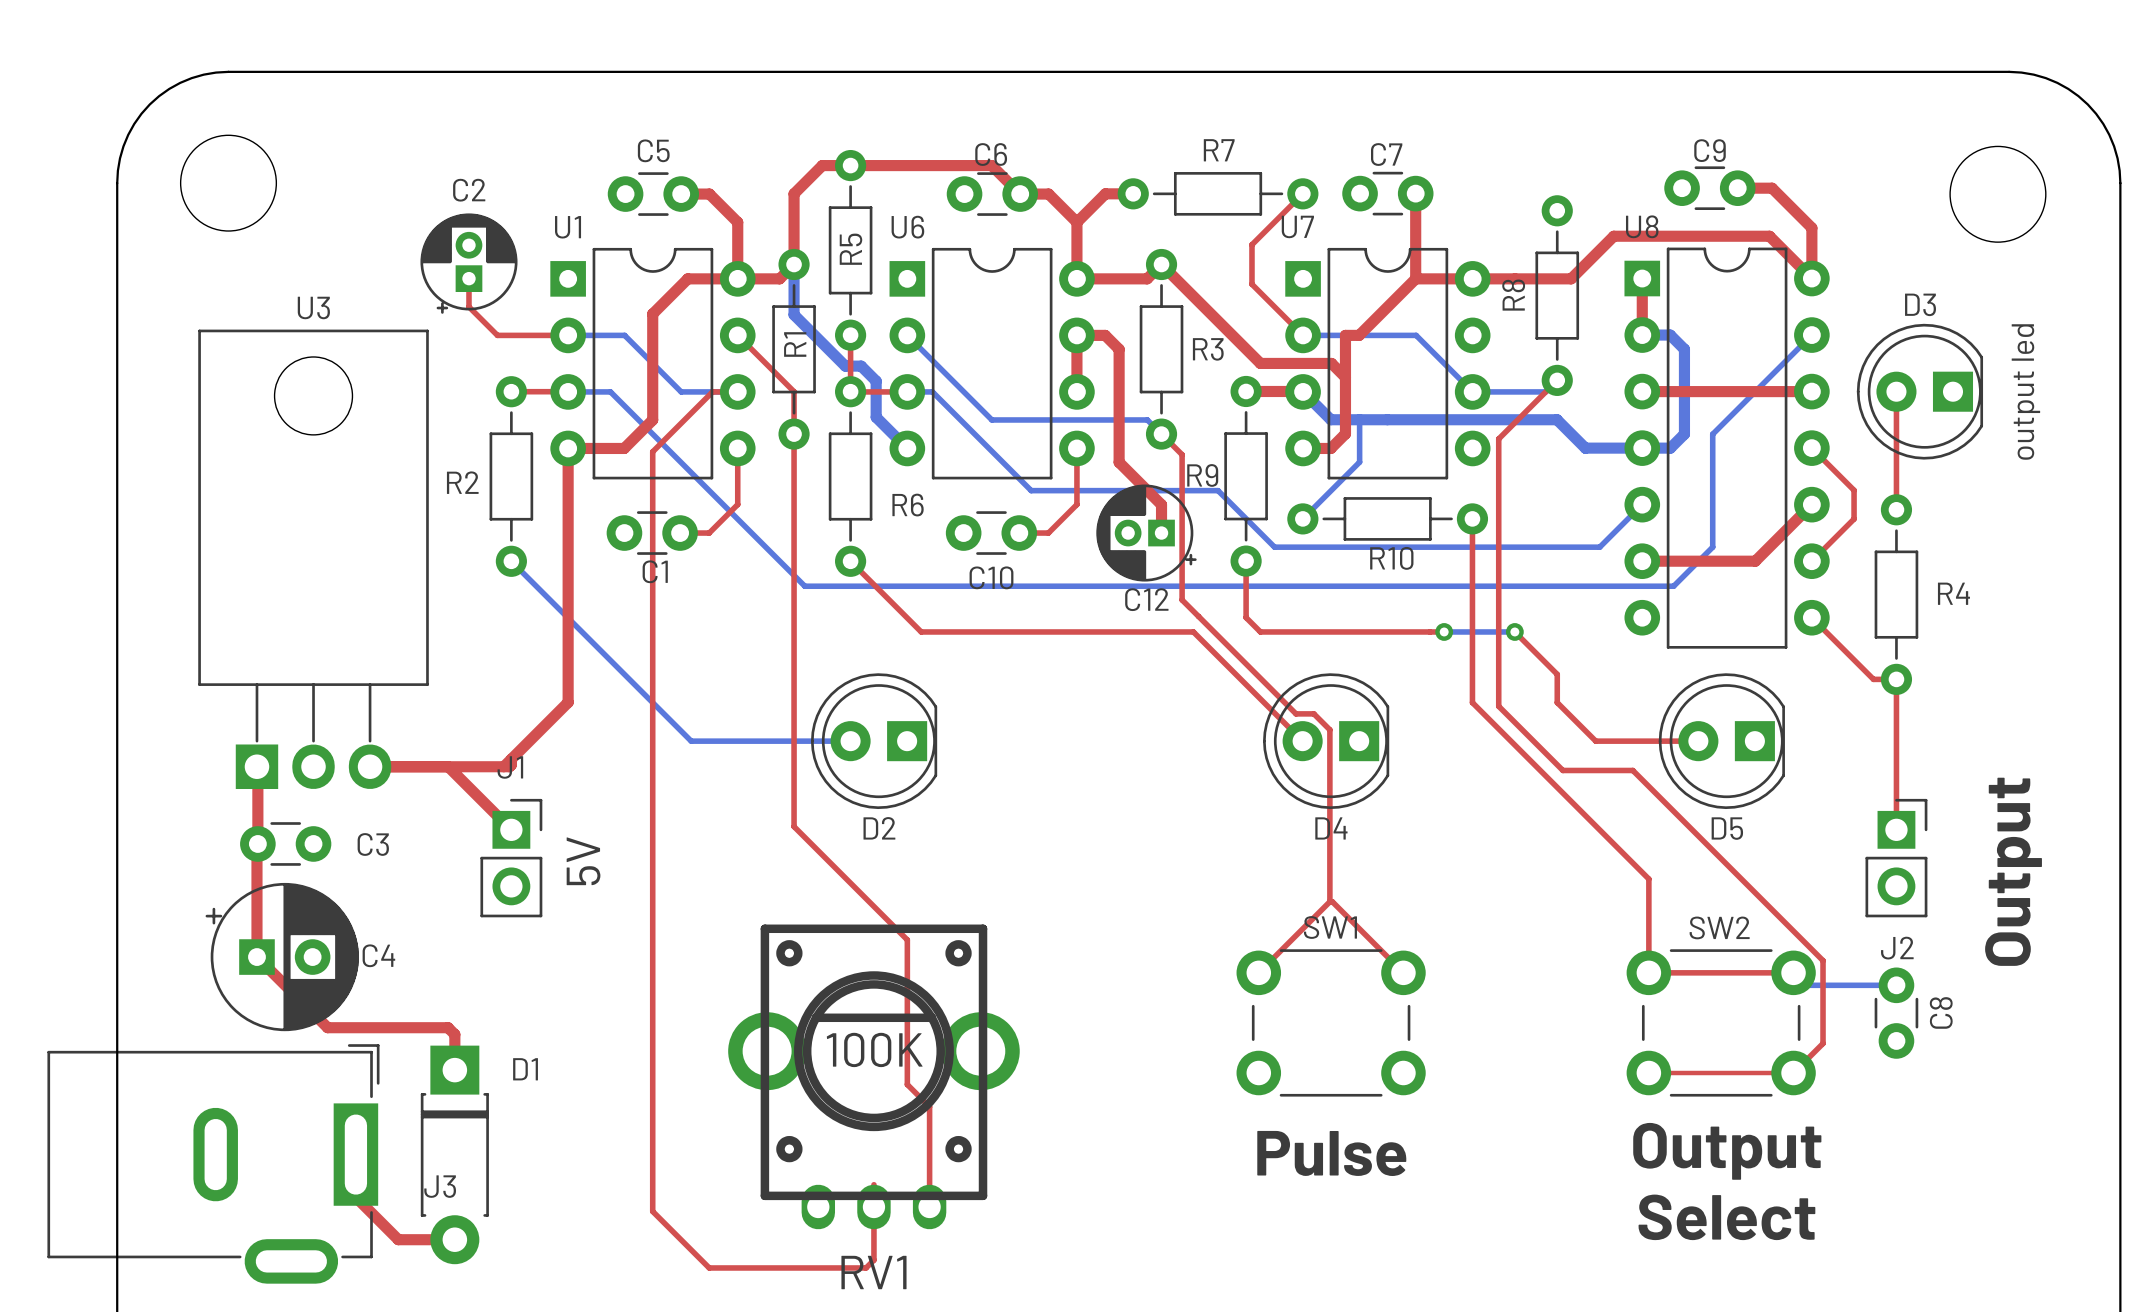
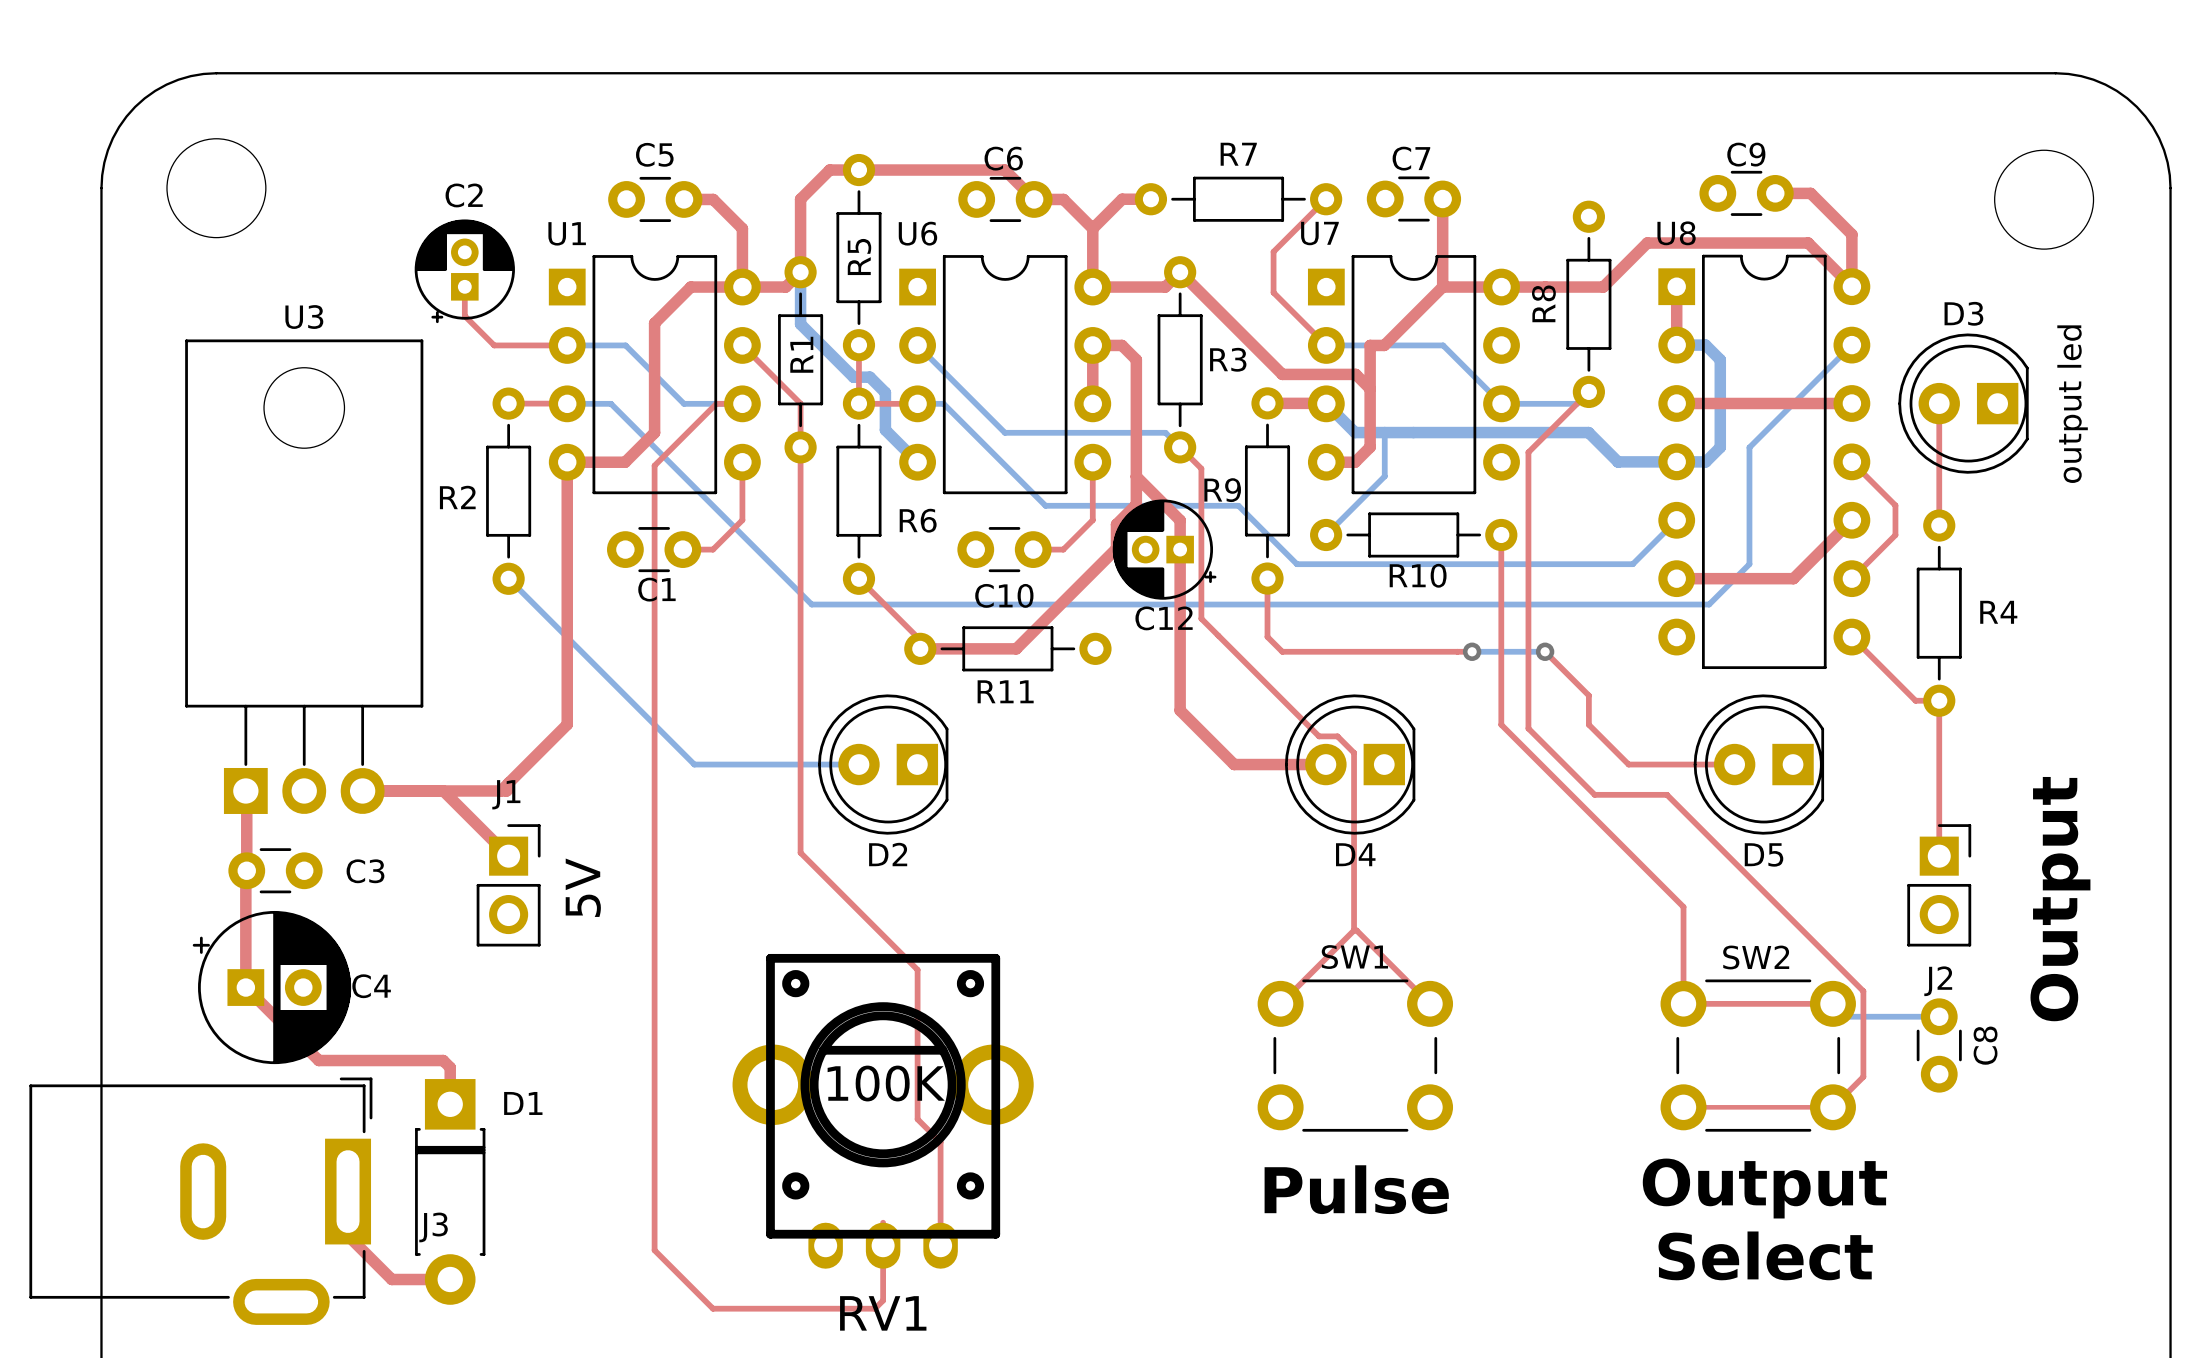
top track: none -> (1136, 476) (1136, 504) (1116, 524) (1116, 548) (1016, 648) (920, 648) (920, 640)
top track: (909, 620) (921, 631) (1193, 631) (1302, 741) -> (1180, 549) (1180, 710) (1234, 764) (1325, 764)
R11: none -> (1007, 648)

